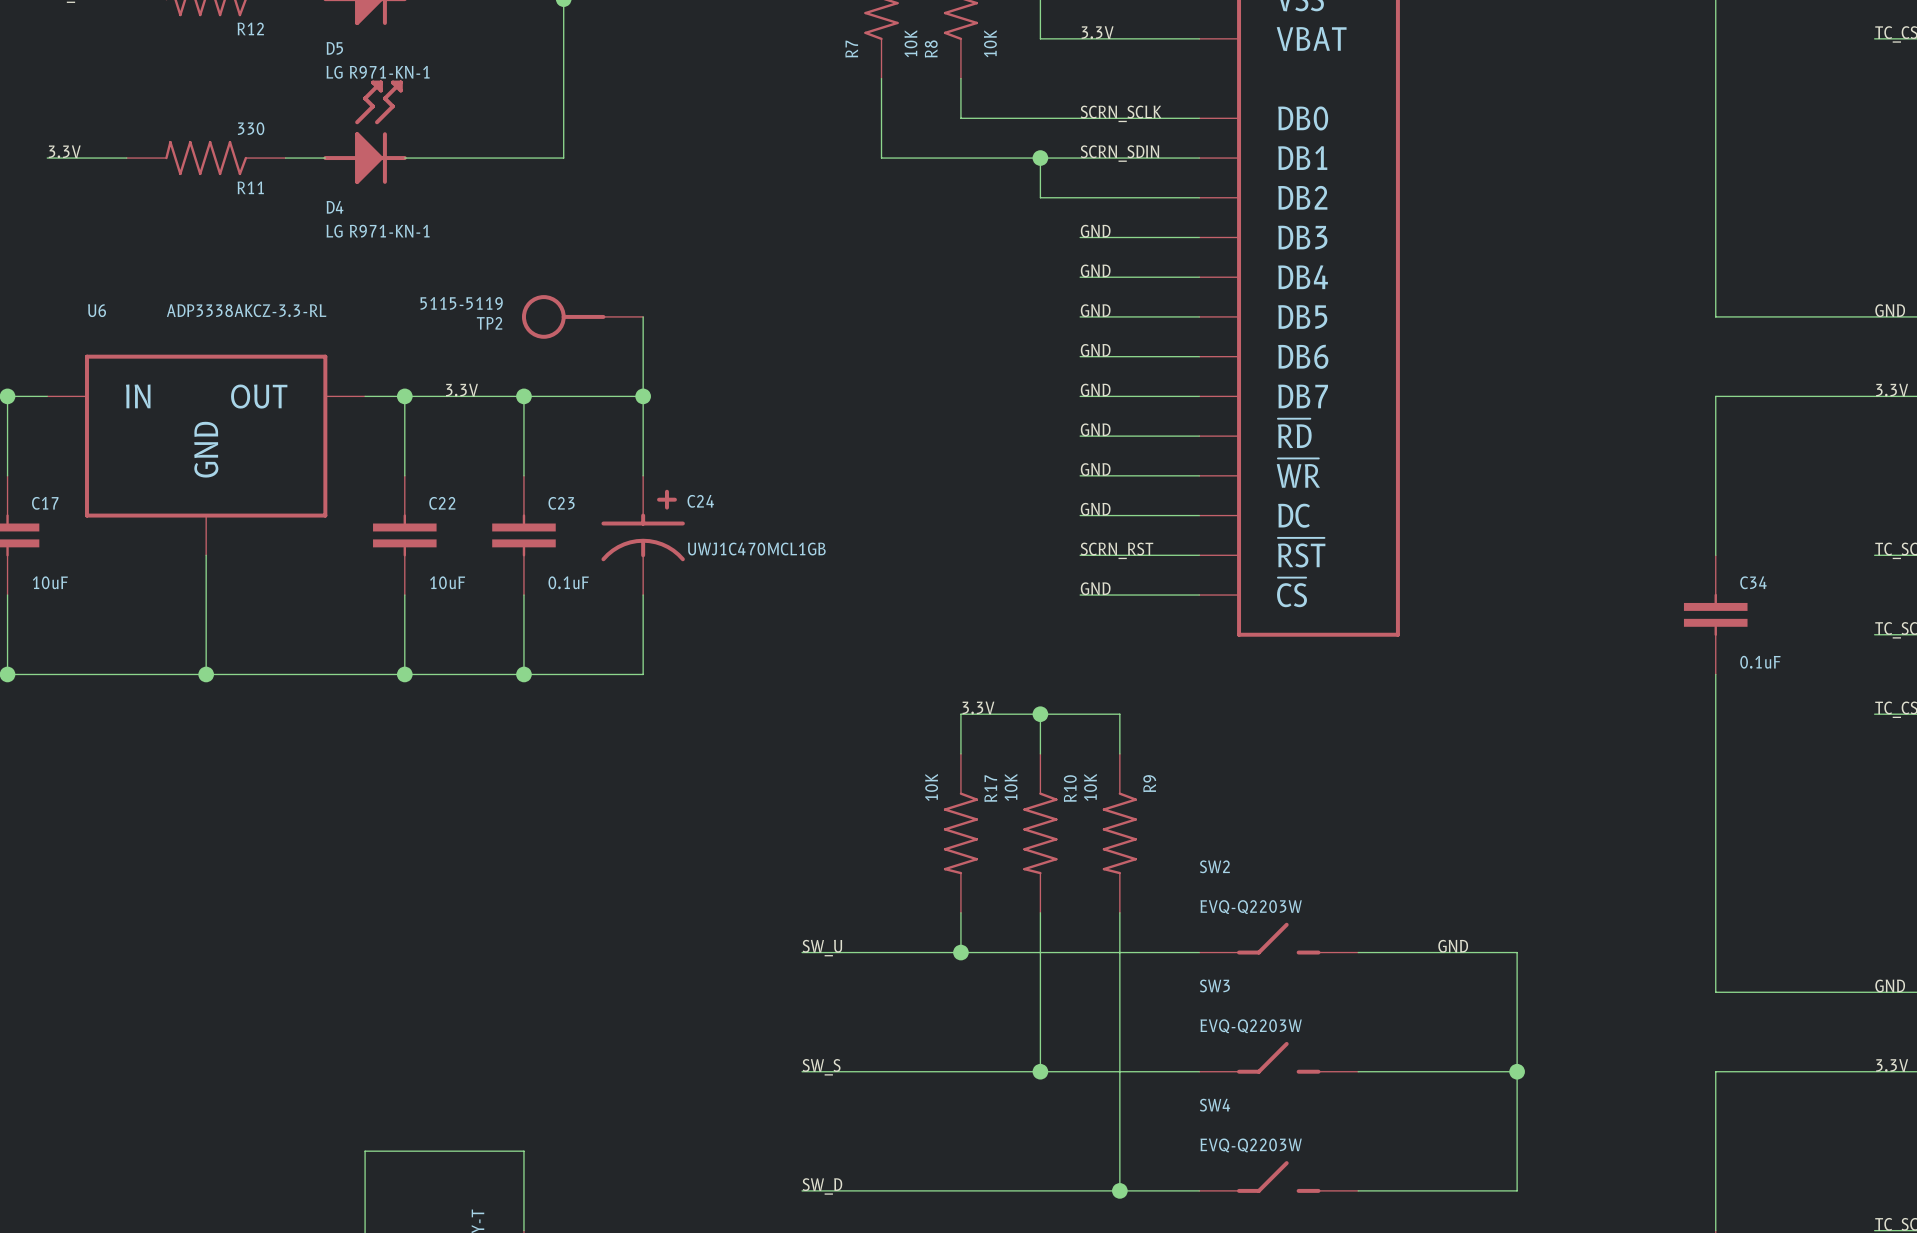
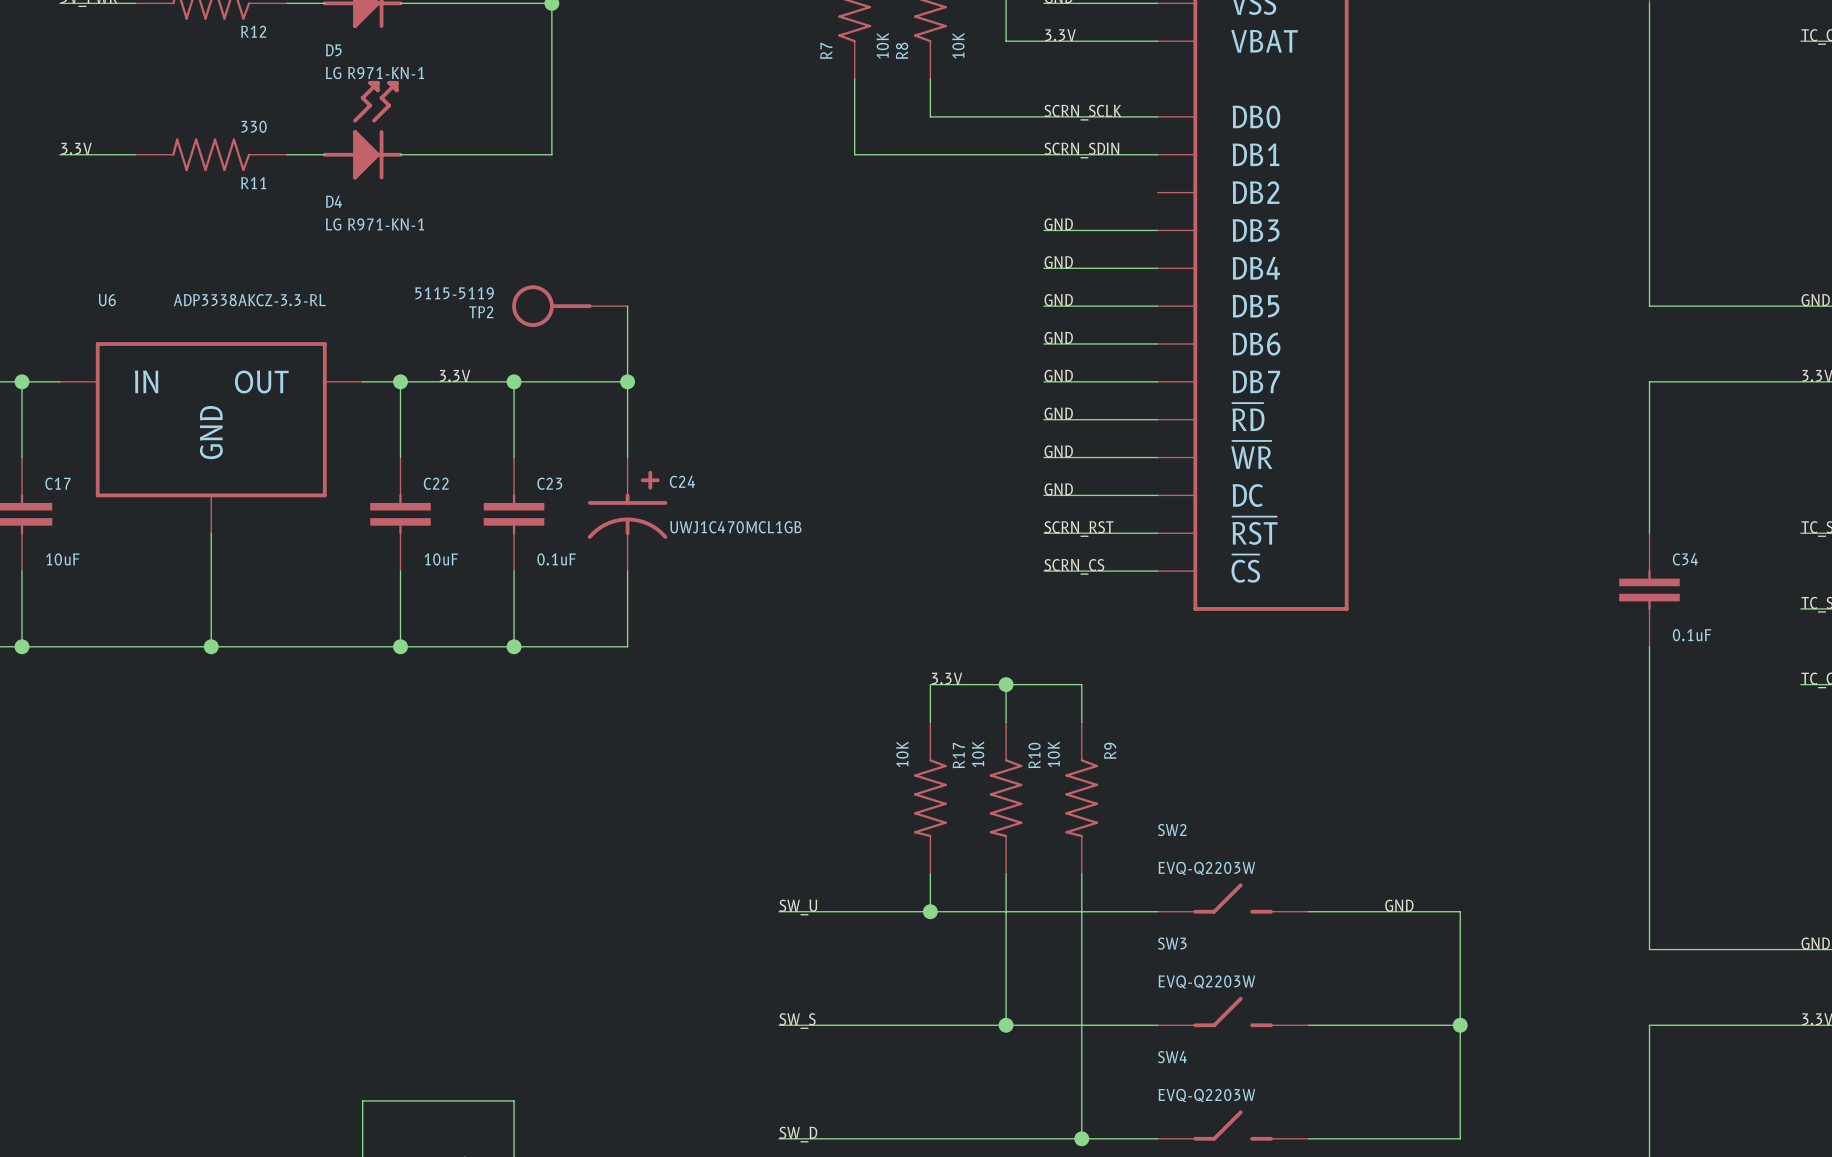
wire: (1040, 158) (1040, 197) (1199, 197) -> none
junction: (1040, 158) -> none
label: GND (1095, 588) -> SCRN_CS (1074, 566)

